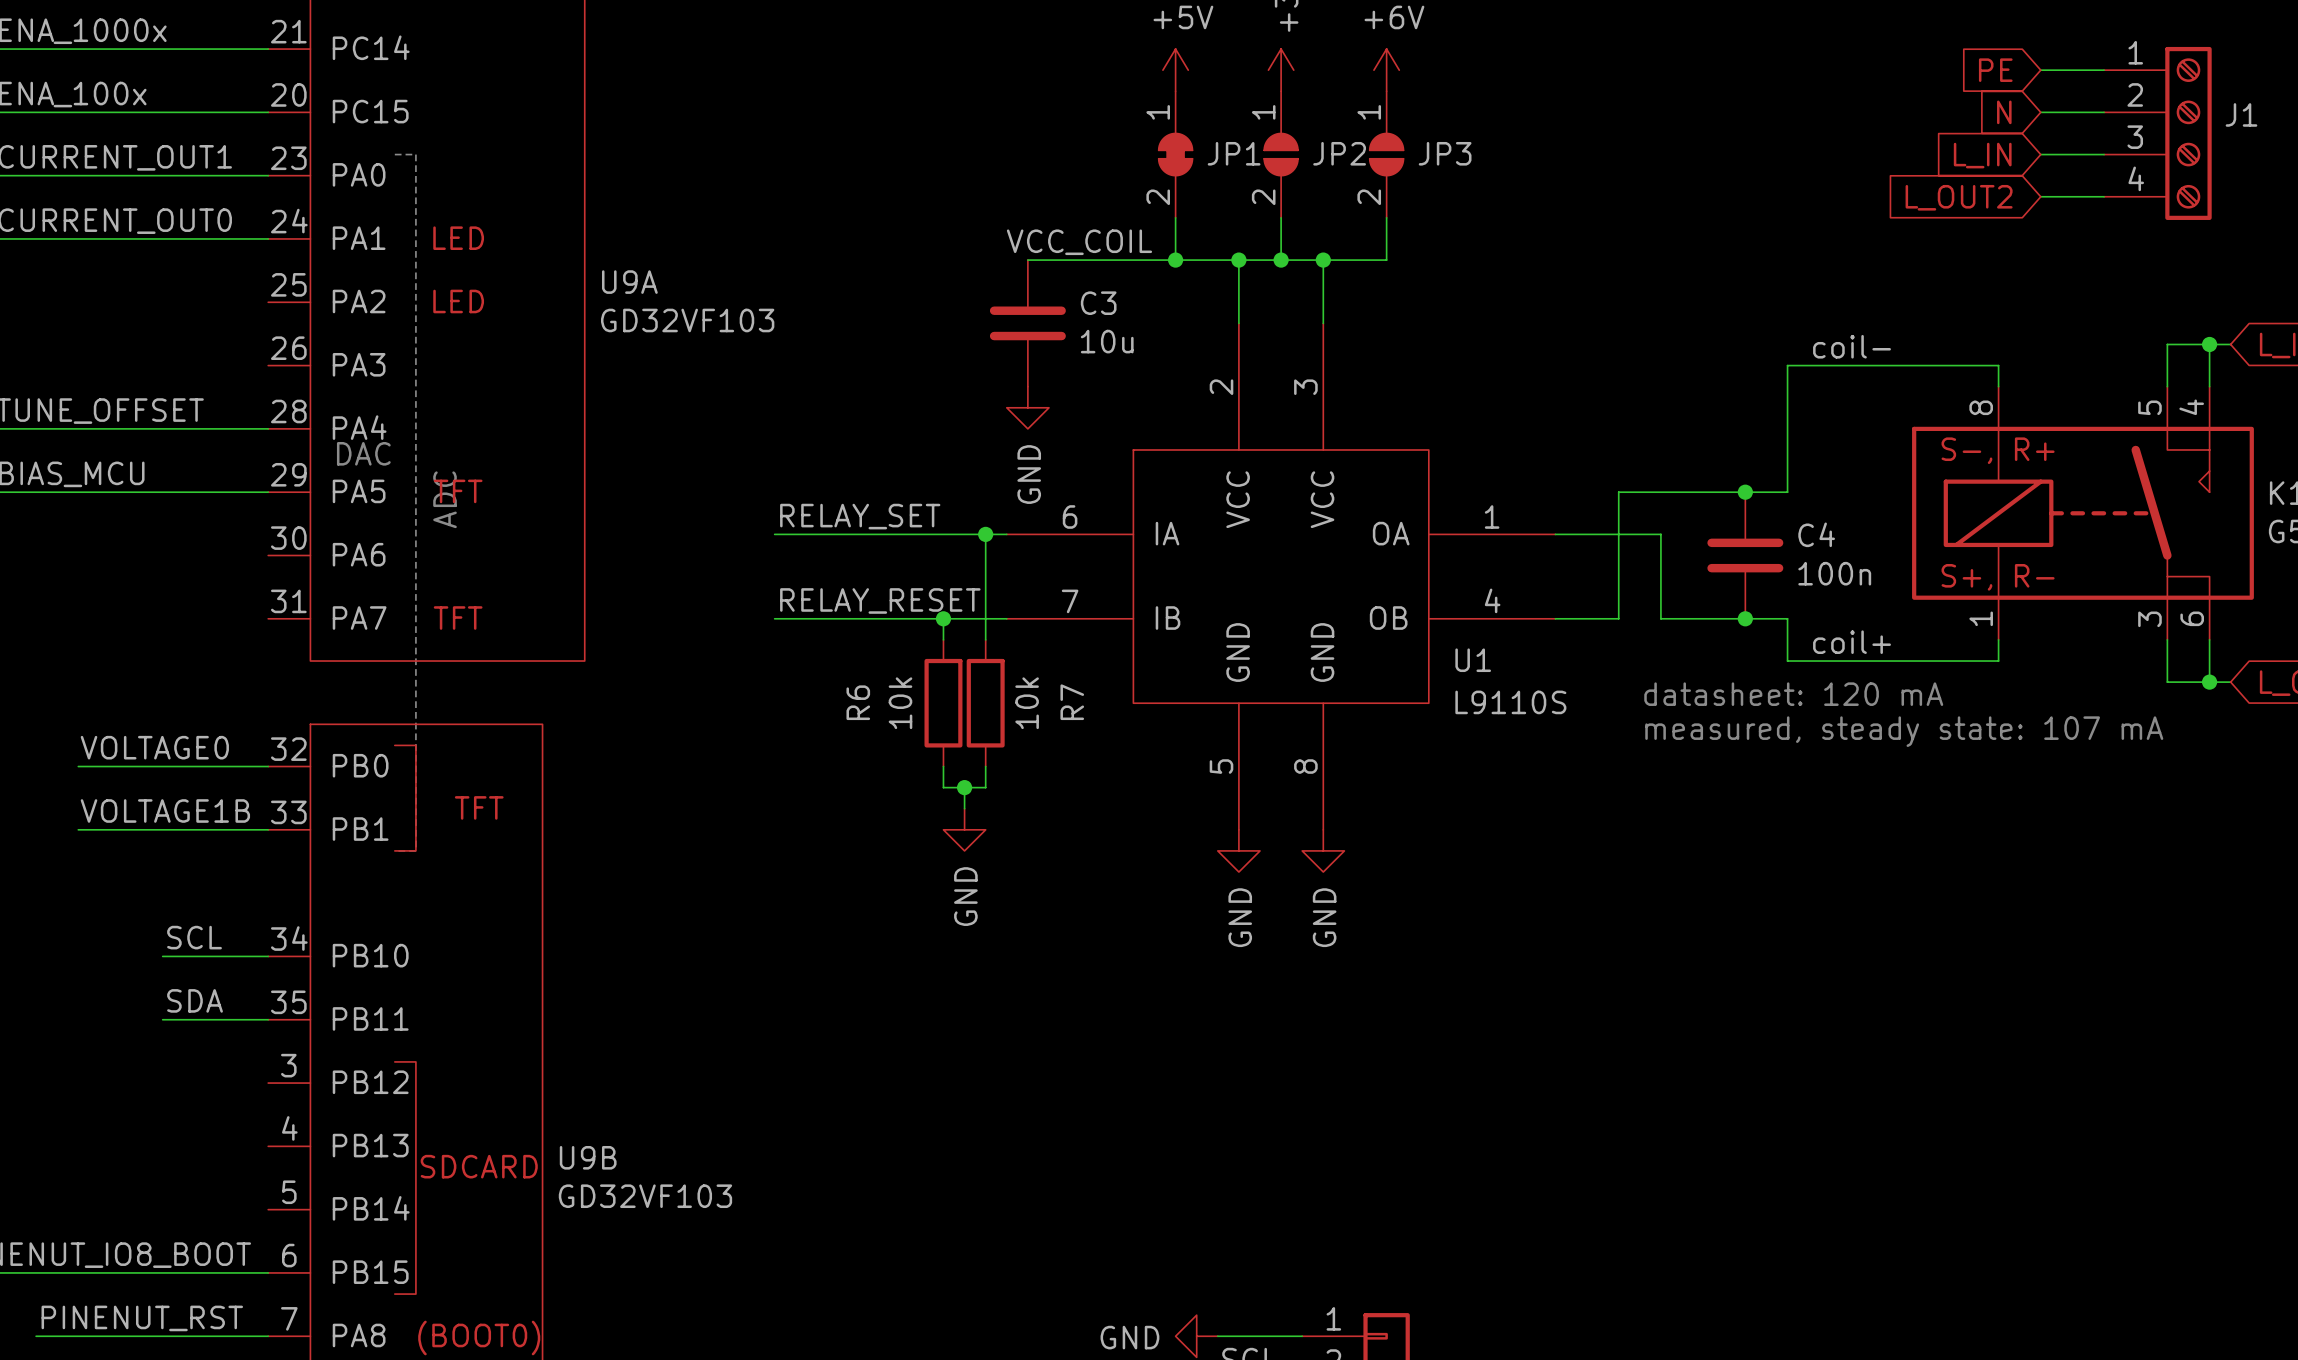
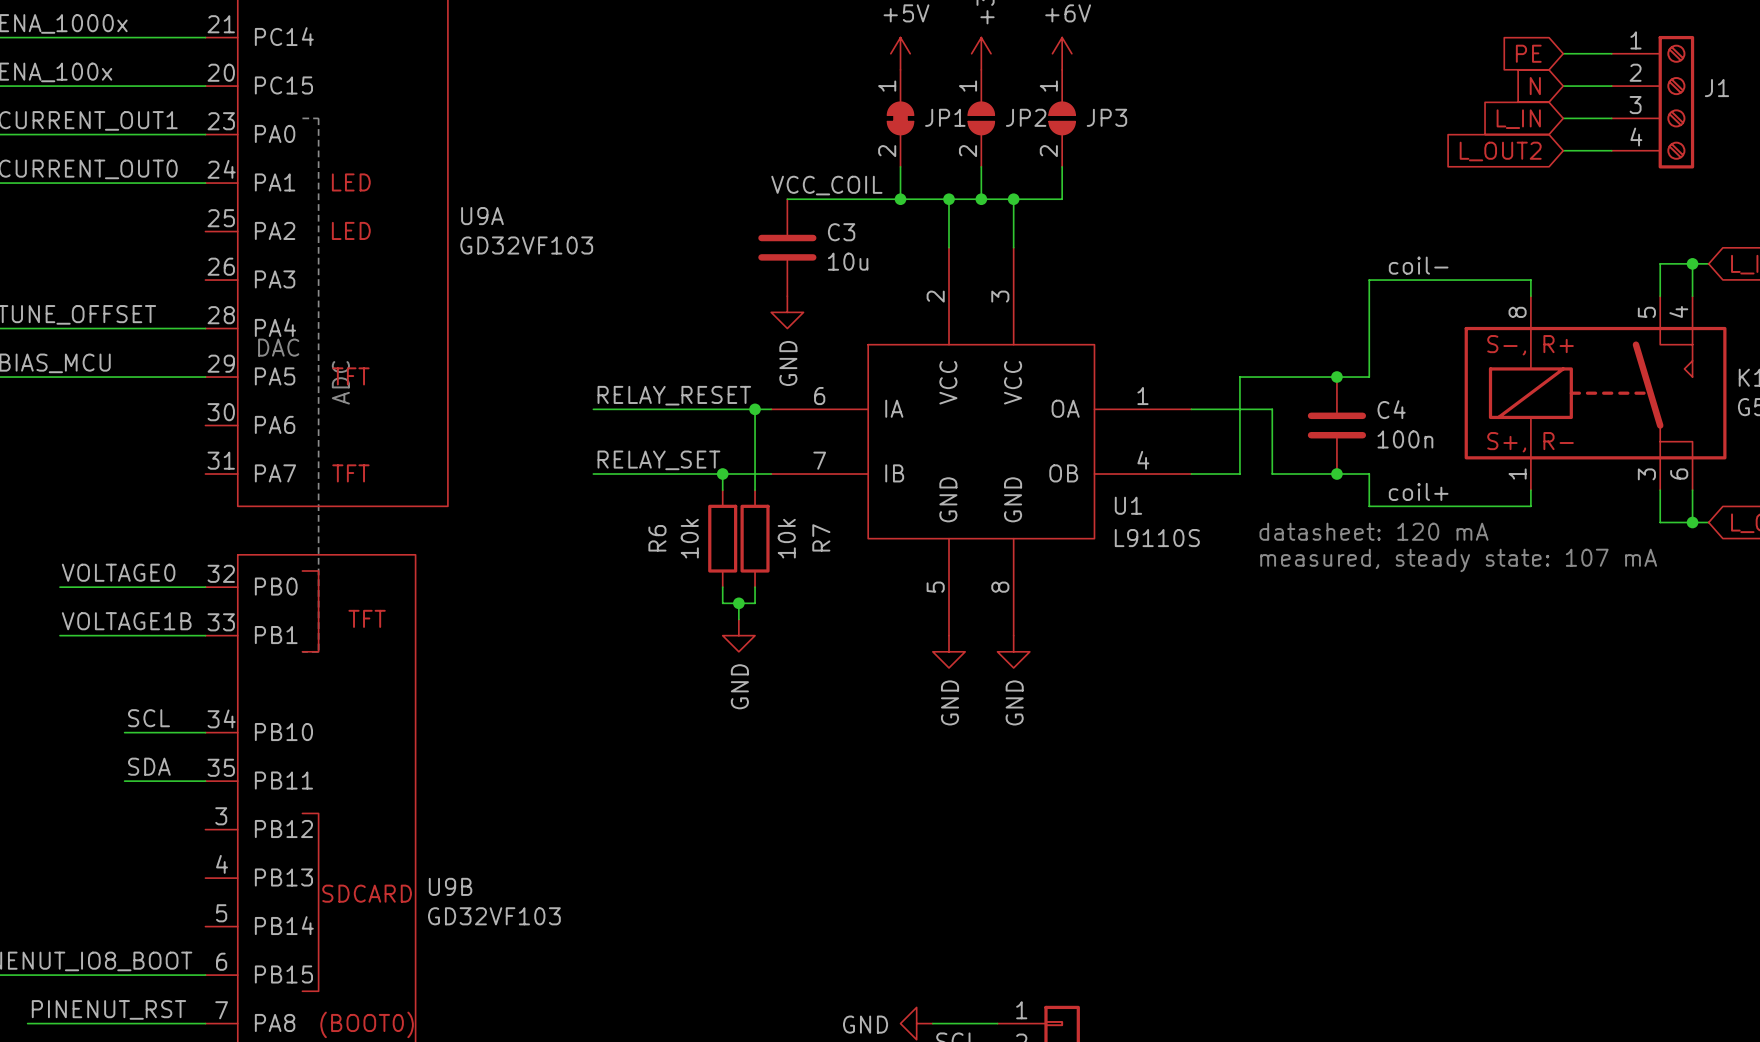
label: RELAY_SET (860, 516) -> RELAY_RESET (674, 395)
label: RELAY_RESET (880, 600) -> RELAY_SET (658, 460)

